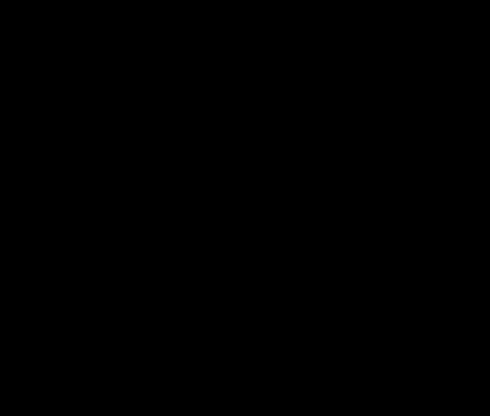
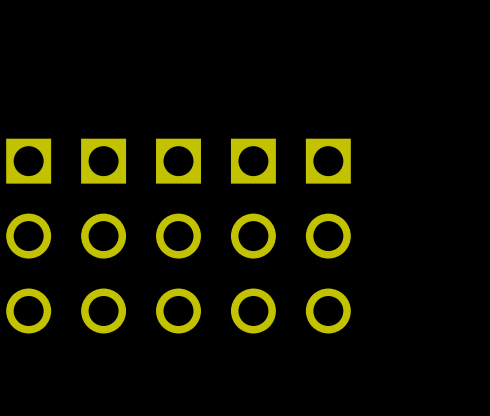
part: none -> (28, 236)
part: none -> (103, 236)
part: none -> (178, 236)
part: none -> (253, 236)
part: none -> (328, 236)

